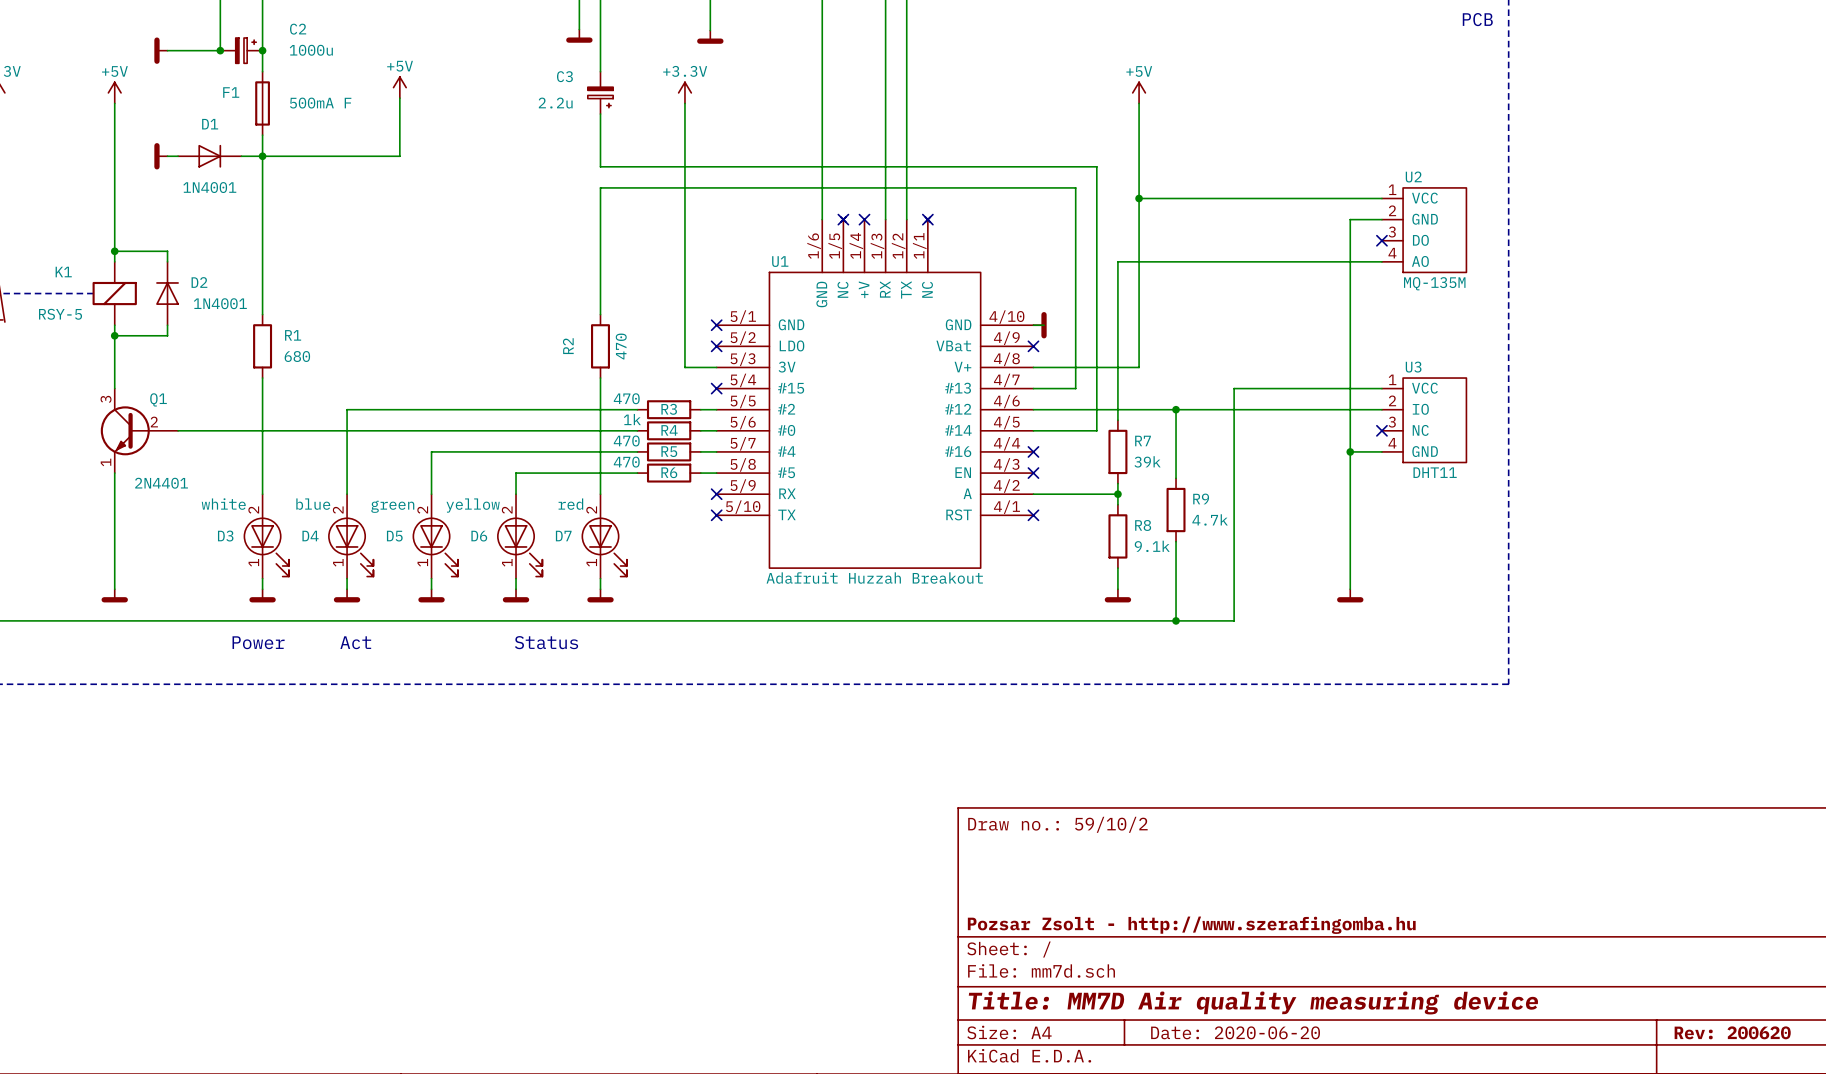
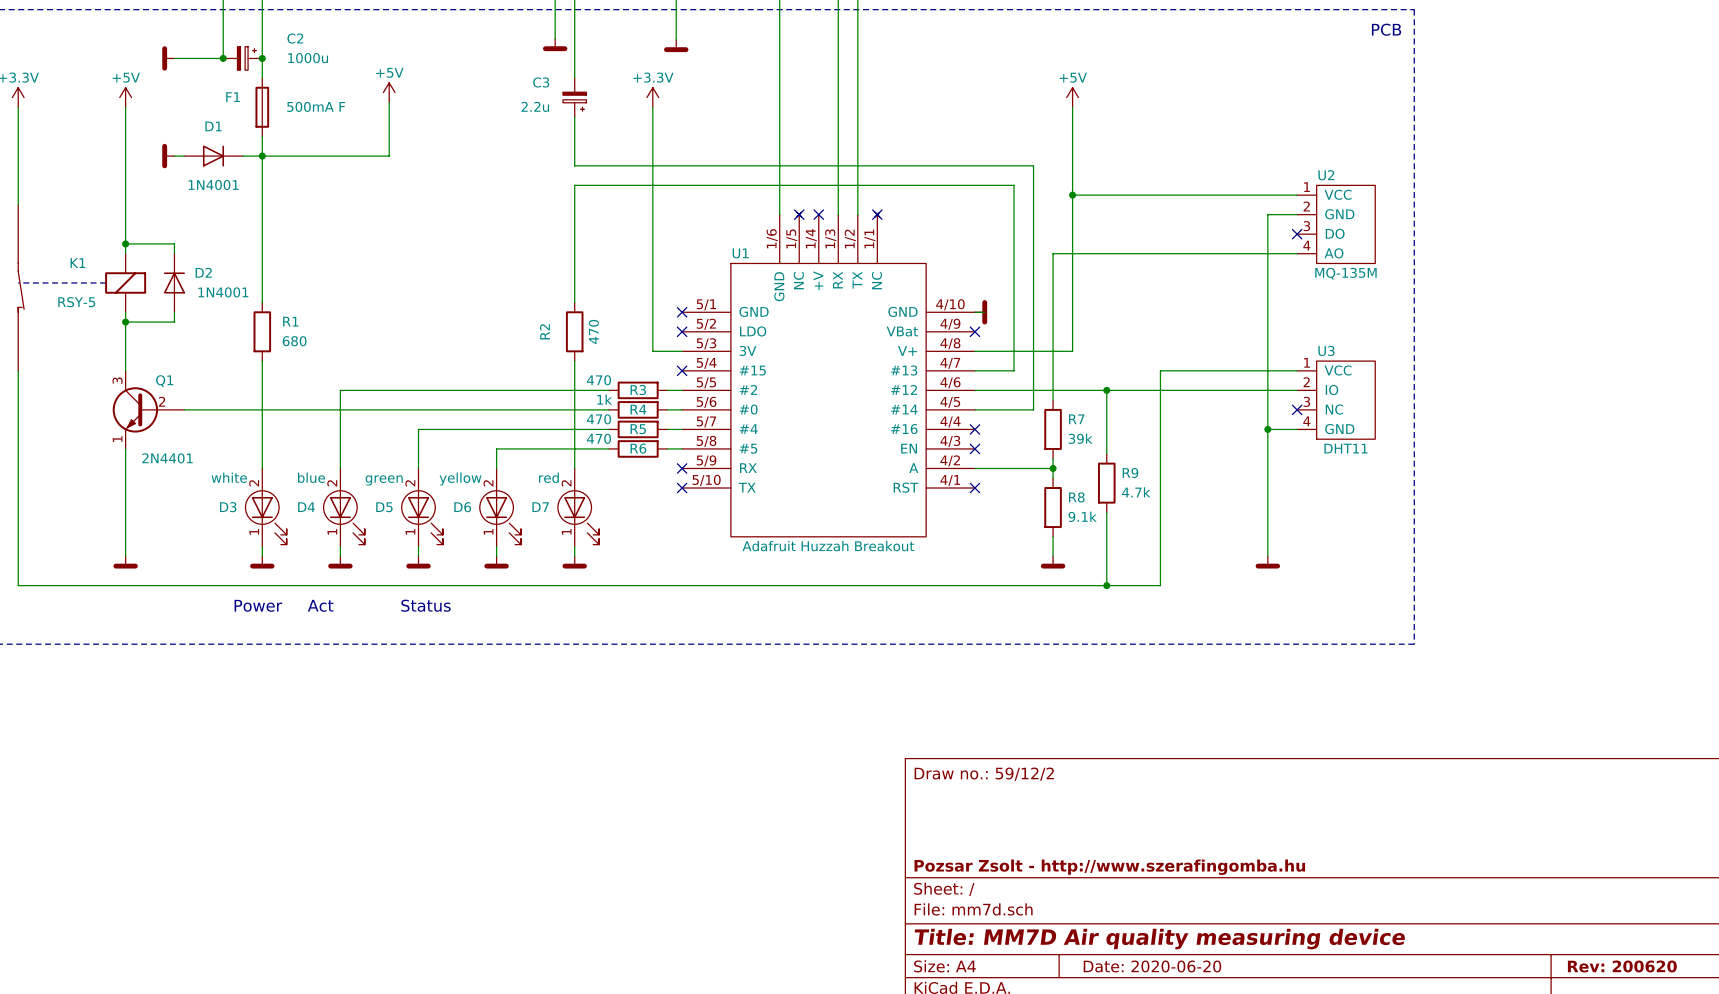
title block: Draw no.: 59/10/2 (1057, 824) -> Draw no.: 59/12/2 (984, 774)

